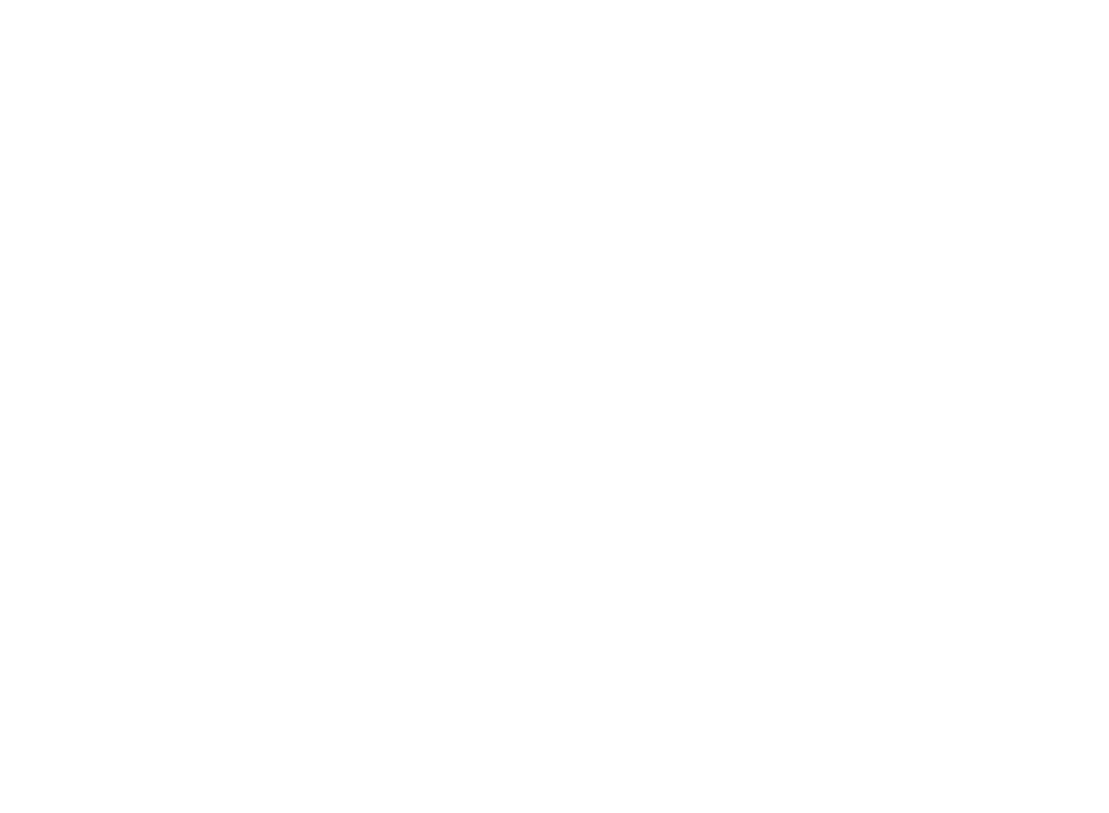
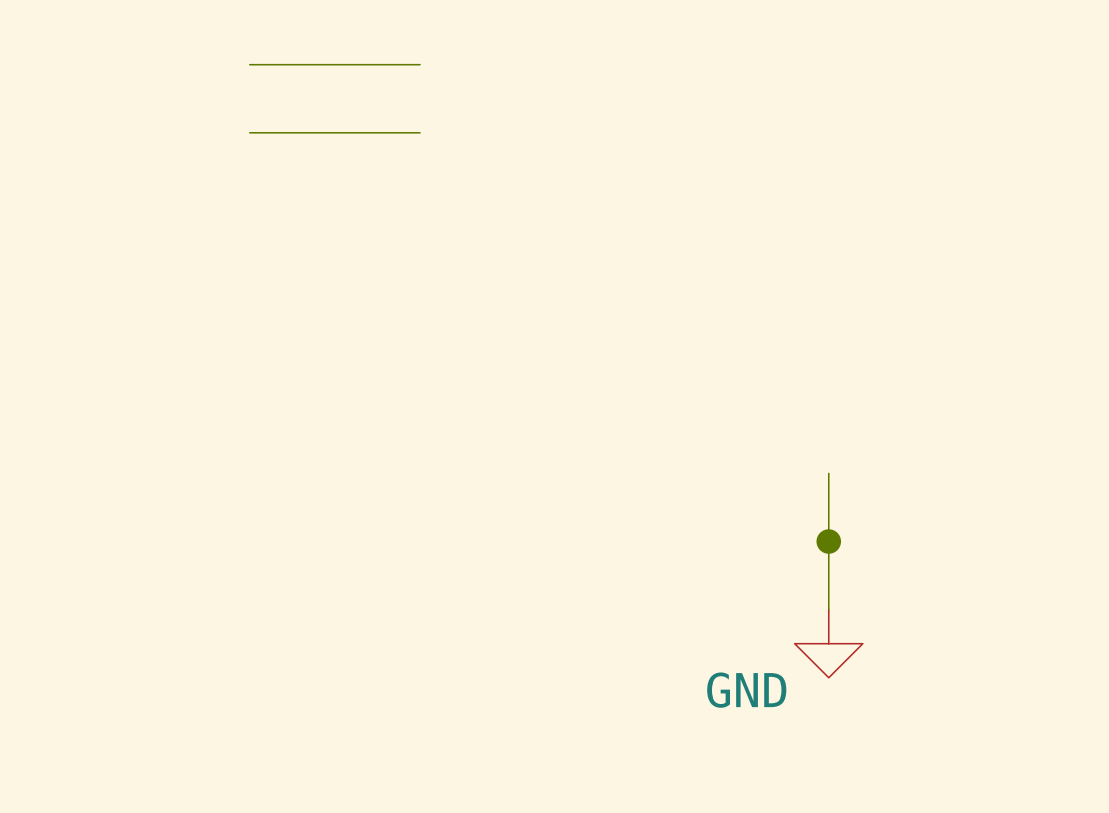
wire: none -> (249, 64) (420, 64)
wire: none -> (249, 132) (420, 132)
wire: none -> (828, 473) (828, 609)
junction: none -> (828, 541)
power symbol: none -> GND (828, 643)

